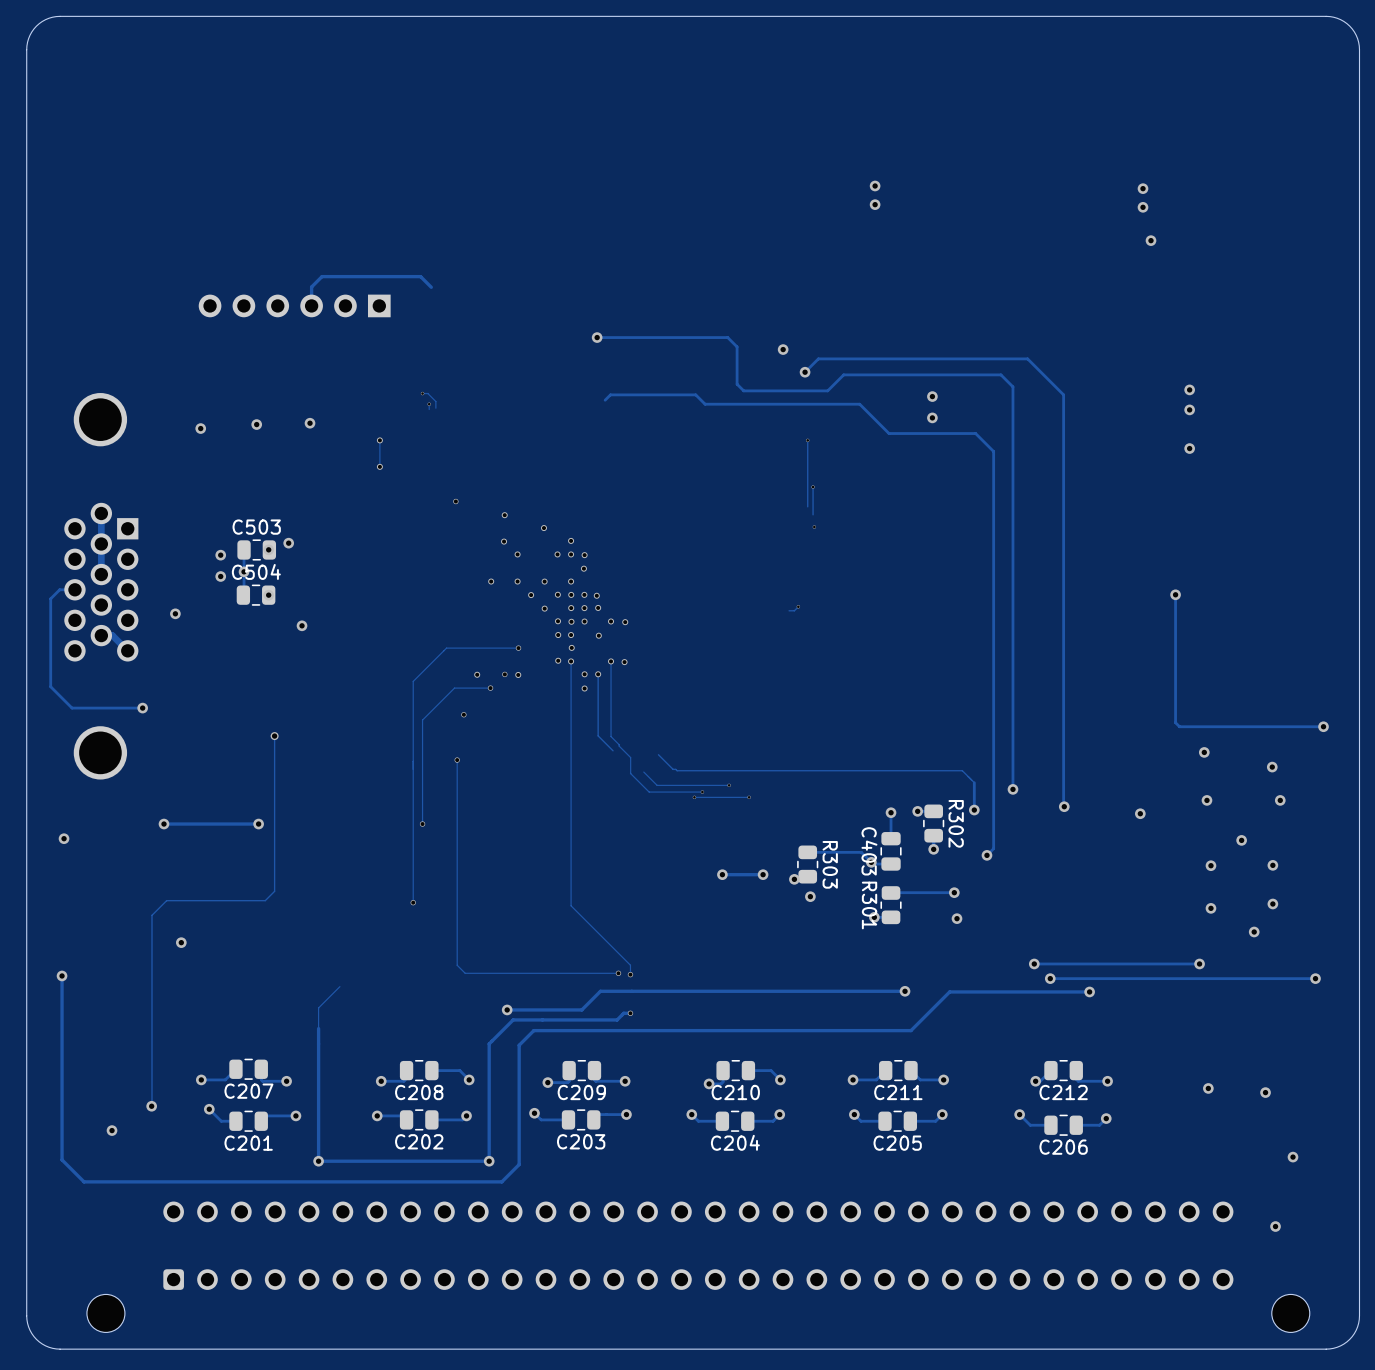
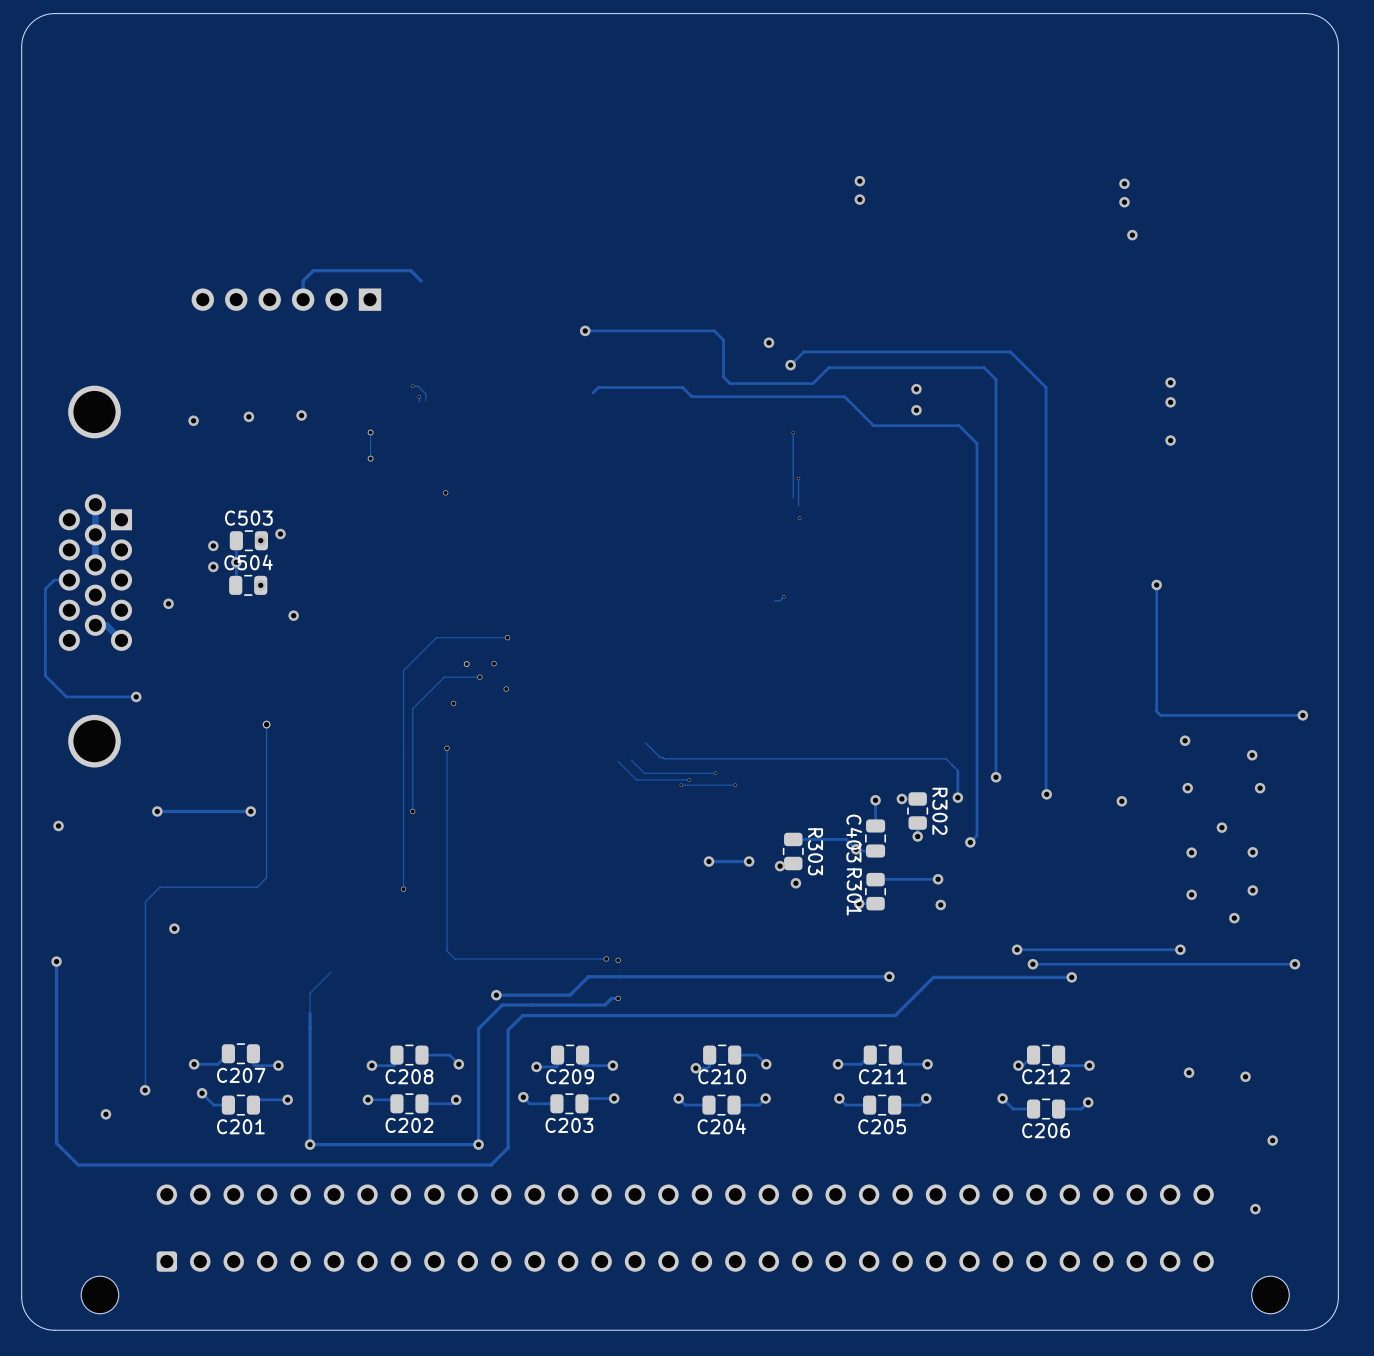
via: (504, 515) -> none
via: (543, 528) -> none
via: (571, 540) -> none
via: (504, 541) -> none
via: (517, 554) -> none
via: (557, 554) -> none
via: (571, 554) -> none
via: (584, 555) -> none
via: (583, 568) -> none
via: (491, 581) -> none
via: (517, 581) -> none
via: (544, 581) -> none
via: (571, 581) -> none
via: (557, 594) -> none
via: (571, 594) -> none
via: (584, 594) -> none
via: (531, 595) -> none
via: (596, 595) -> none
via: (598, 607) -> none
via: (544, 608) -> none
via: (571, 608) -> none
via: (584, 608) -> none
via: (558, 621) -> none
via: (571, 621) -> none
via: (584, 621) -> none
via: (611, 621) -> none
via: (625, 622) -> none
via: (558, 635) -> none
via: (571, 635) -> none
via: (598, 635) -> none
via: (571, 647) -> none
via: (558, 660) -> none
track: (571, 661) (571, 905) (630, 965) (630, 974) -> none
via: (571, 661) -> none
track: (611, 661) (611, 736) (630, 757) (630, 773) -> none
via: (611, 661) -> none
via: (624, 662) -> none
via: (518, 674) -> none
via: (584, 674) -> none
track: (598, 674) (598, 735) (613, 750) -> none
via: (598, 674) -> none
via: (584, 688) -> none
via: none -> (506, 689)

